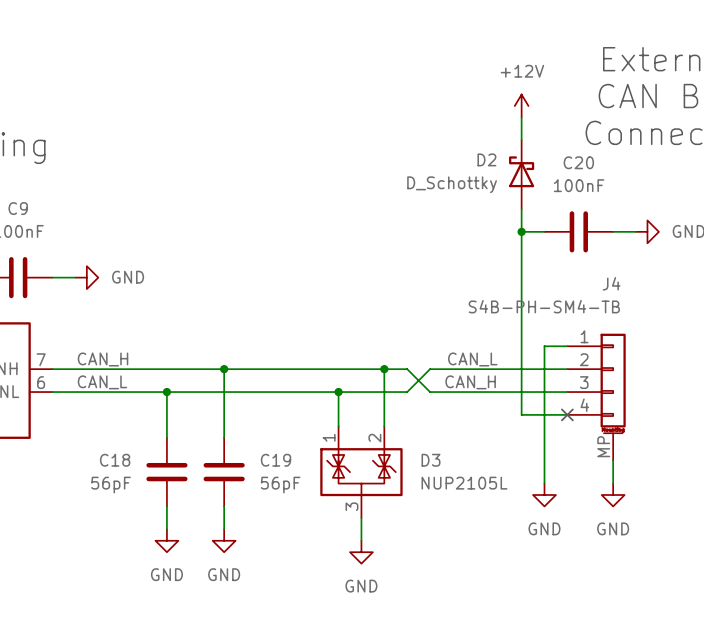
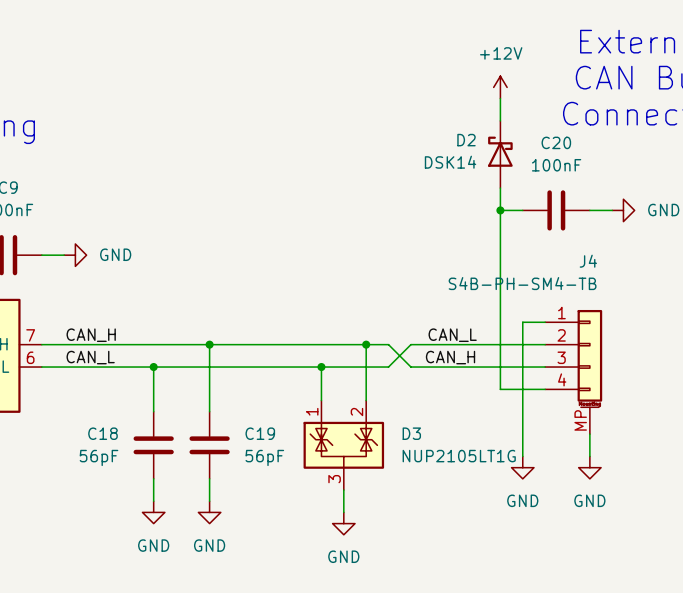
D2 value: D_Schottky (452, 184) -> DSK14 (450, 162)
no-connect mark: (567, 414) -> none
D3 value: NUP2105L (464, 483) -> NUP2105LT1G (459, 456)

